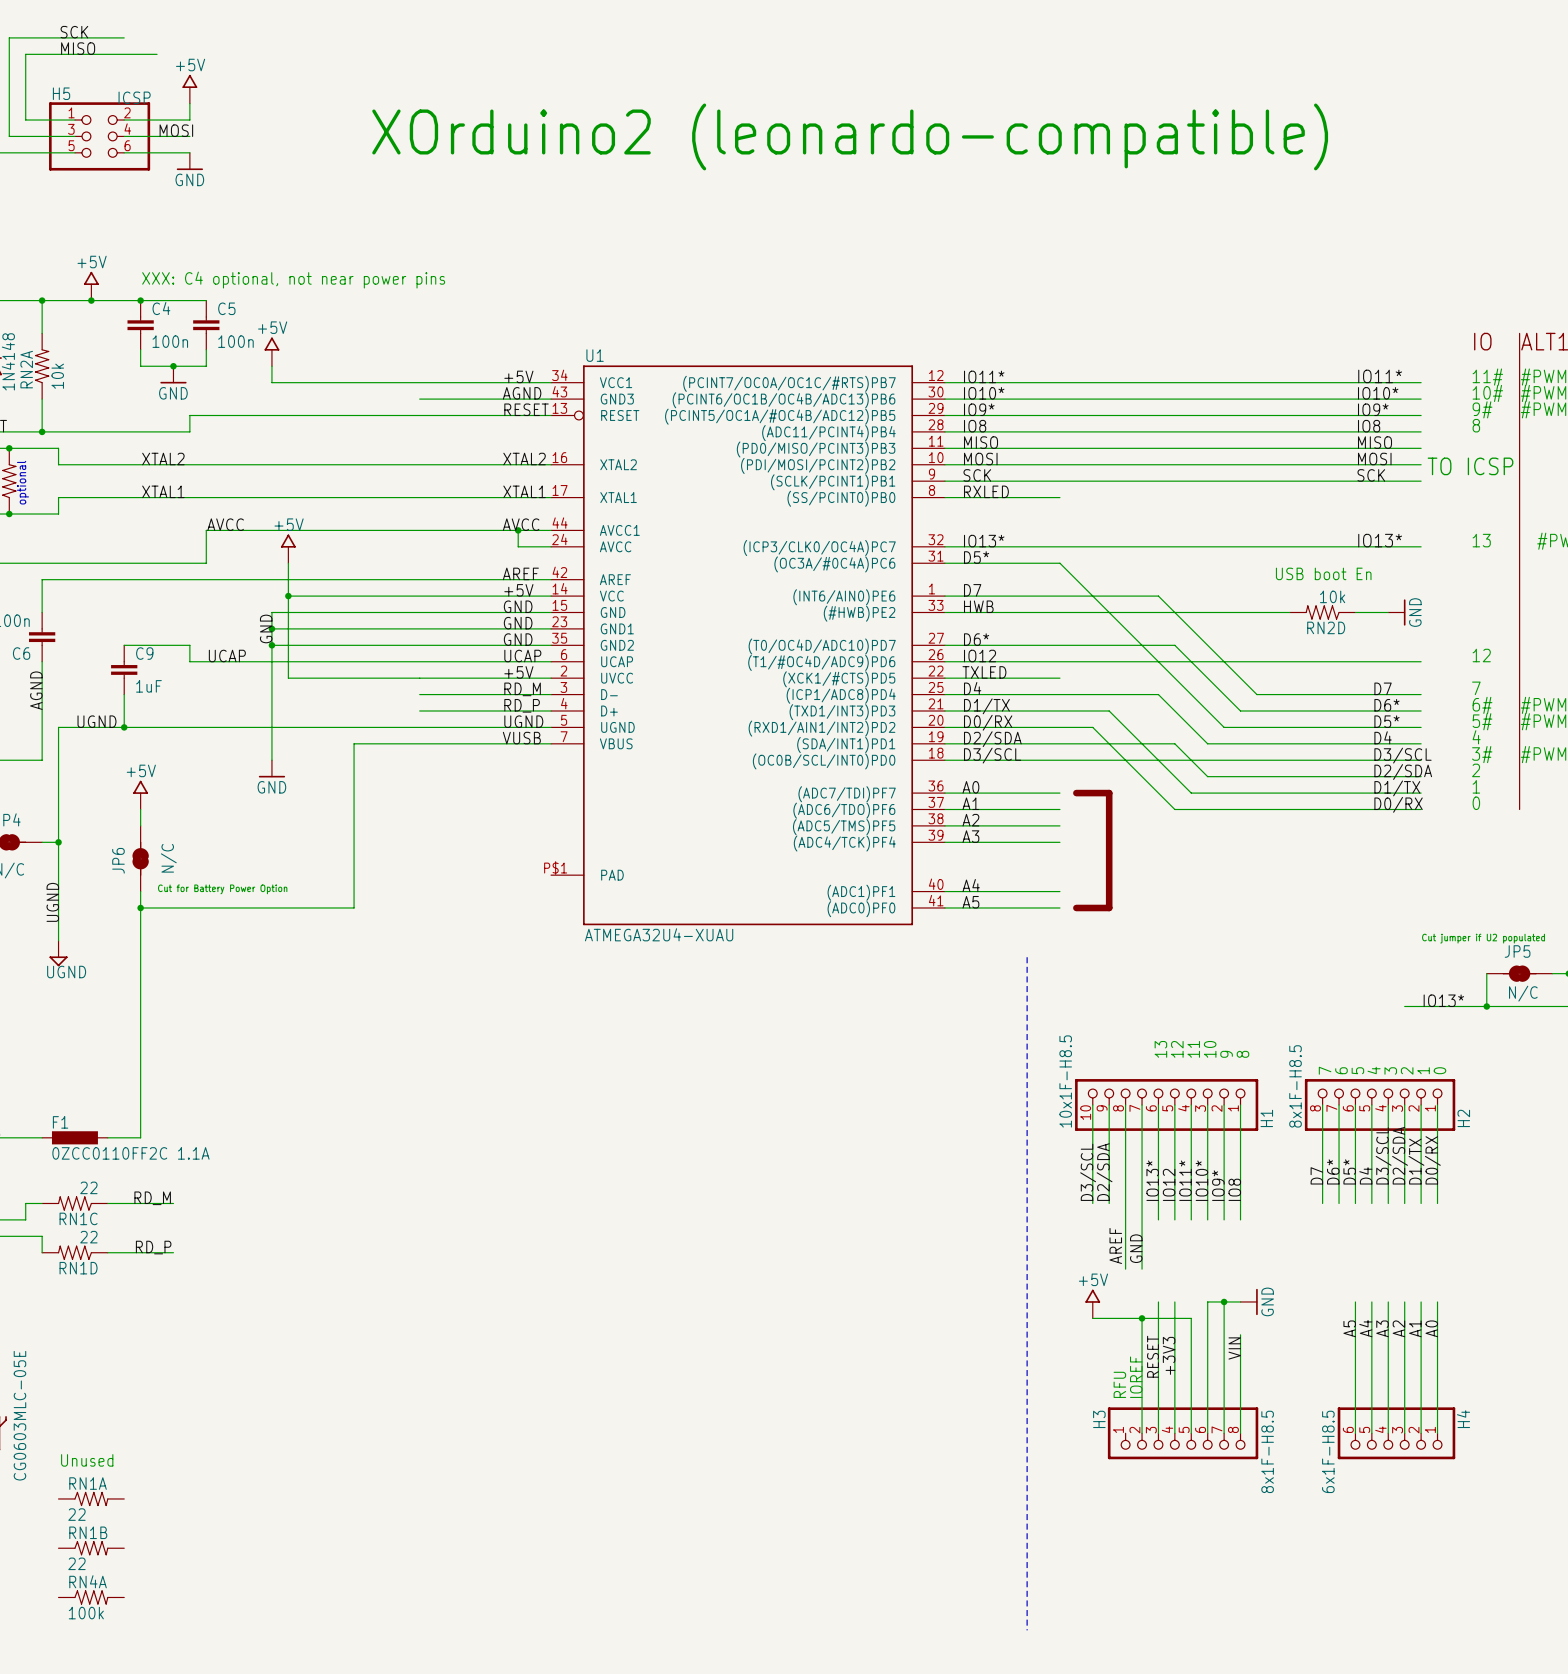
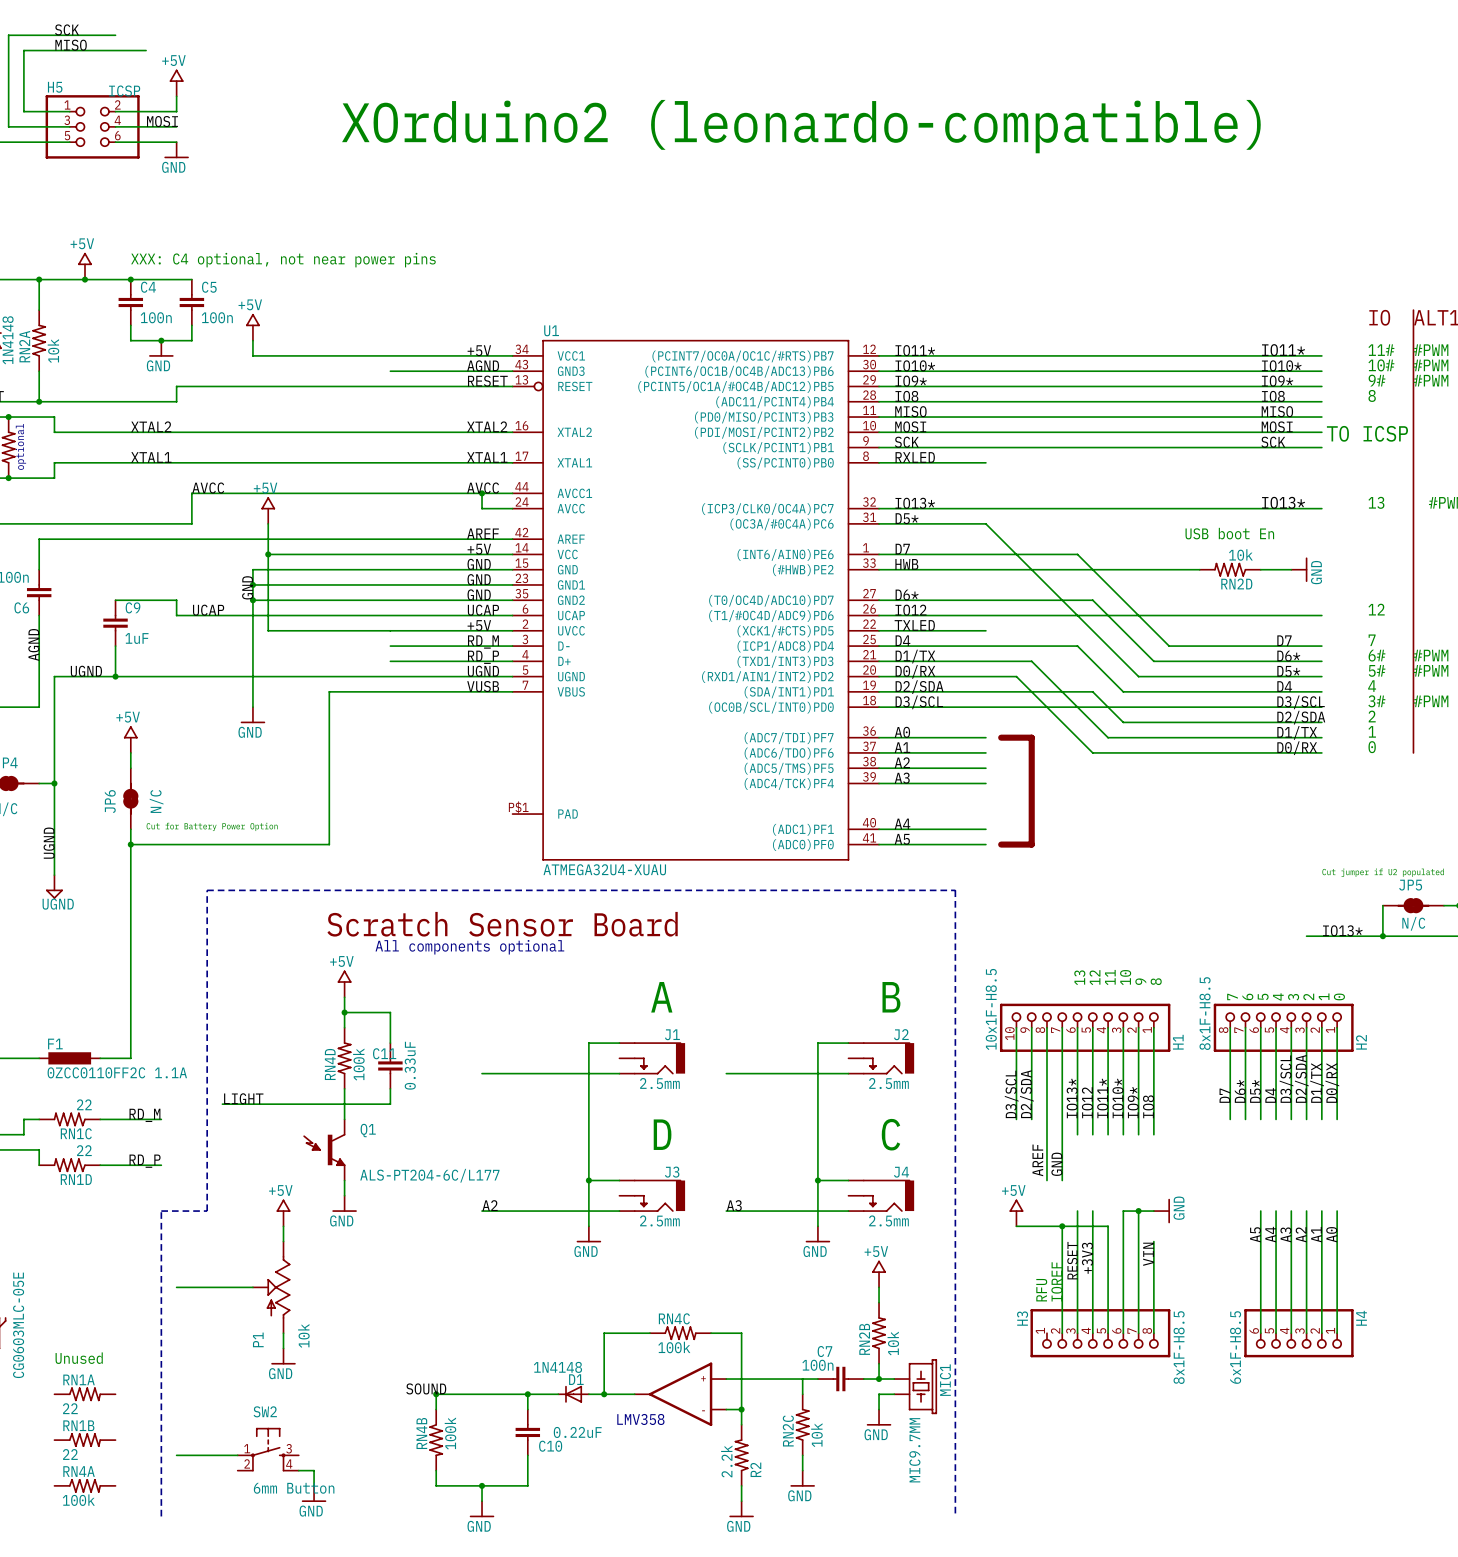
line: none -> (955, 890) (207, 890) (207, 1211) (161, 1211) (161, 1516)
text: none -> Scratch Sensor Board (502, 924)
text: none -> All components optional (469, 947)
power symbol: none -> +5V (344, 983)
wire: none -> (344, 997) (344, 1027)
text: none -> A (661, 997)
text: none -> B (891, 997)
wire: none -> (344, 1012) (390, 1012) (390, 1043)
junction: none -> (344, 1012)
wire: none -> (619, 1043) (588, 1043) (588, 1226)
wire: none -> (848, 1043) (817, 1043) (817, 1226)
RN4D: none -> 100k (344, 1058)
J1: none -> 2.5mm (652, 1058)
J2: none -> 2.5mm (881, 1058)
C11: none -> 0.33uF (390, 1065)
wire: none -> (482, 1073) (619, 1073)
wire: none -> (726, 1073) (848, 1073)
wire: none -> (344, 1088) (344, 1119)
wire: none -> (390, 1088) (390, 1104) (222, 1104)
label: none -> LIGHT (243, 1098)
text: none -> D (662, 1134)
text: none -> C (890, 1134)
Q1: none -> ALS-PT204-6C/L177 (324, 1149)
wire: none -> (344, 1180) (344, 1195)
wire: none -> (588, 1180) (619, 1180)
junction: none -> (588, 1180)
wire: none -> (817, 1180) (848, 1180)
junction: none -> (817, 1180)
J3: none -> 2.5mm (652, 1195)
J4: none -> 2.5mm (881, 1195)
power symbol: none -> GND (344, 1203)
label: none -> A2 (490, 1205)
label: none -> A3 (734, 1205)
wire: none -> (482, 1211) (619, 1211)
wire: none -> (726, 1211) (848, 1211)
power symbol: none -> +5V (283, 1212)
wire: none -> (283, 1226) (283, 1241)
power symbol: none -> GND (588, 1234)
power symbol: none -> GND (817, 1234)
power symbol: none -> +5V (879, 1274)
wire: none -> (176, 1287) (252, 1287)
P1: none -> 10k (271, 1287)
wire: none -> (879, 1287) (879, 1302)
wire: none -> (283, 1333) (283, 1348)
wire: none -> (649, 1333) (604, 1333) (604, 1394)
RN4C: none -> 100k (680, 1333)
wire: none -> (711, 1333) (741, 1333) (741, 1424)
RN2B: none -> 10k (879, 1333)
power symbol: none -> GND (283, 1356)
wire: none -> (879, 1363) (879, 1379)
wire: none -> (726, 1379) (817, 1379)
wire: none -> (802, 1379) (802, 1394)
C7: none -> 100n (840, 1379)
wire: none -> (863, 1379) (894, 1379)
junction: none -> (879, 1379)
MIC1: none -> MIC9.7MM (915, 1386)
label: none -> SOUND (426, 1388)
junction: none -> (436, 1394)
wire: none -> (527, 1394) (527, 1409)
junction: none -> (527, 1394)
wire: none -> (558, 1394) (436, 1394) (436, 1409)
D1: none -> 1N4148 (573, 1394)
wire: none -> (588, 1394) (634, 1394)
junction: none -> (604, 1394)
part: none -> (680, 1394)
wire: none -> (894, 1394) (879, 1394) (879, 1409)
wire: none -> (726, 1409) (741, 1409)
junction: none -> (741, 1409)
power symbol: none -> GND (879, 1417)
text: none -> LMV358 (640, 1419)
RN2C: none -> 10k (802, 1424)
C10: none -> 0.22uF (527, 1432)
RN4B: none -> 100k (436, 1440)
SW2: none -> 6mm Button (268, 1449)
wire: none -> (176, 1455) (237, 1455)
wire: none -> (527, 1455) (527, 1485) (436, 1485) (436, 1470)
R2: none -> 2.2k (741, 1455)
wire: none -> (802, 1455) (802, 1470)
wire: none -> (298, 1470) (314, 1470) (314, 1485)
power symbol: none -> GND (802, 1478)
wire: none -> (482, 1485) (482, 1501)
junction: none -> (482, 1485)
wire: none -> (741, 1485) (741, 1501)
power symbol: none -> GND (314, 1493)
power symbol: none -> GND (482, 1509)
power symbol: none -> GND (741, 1509)

